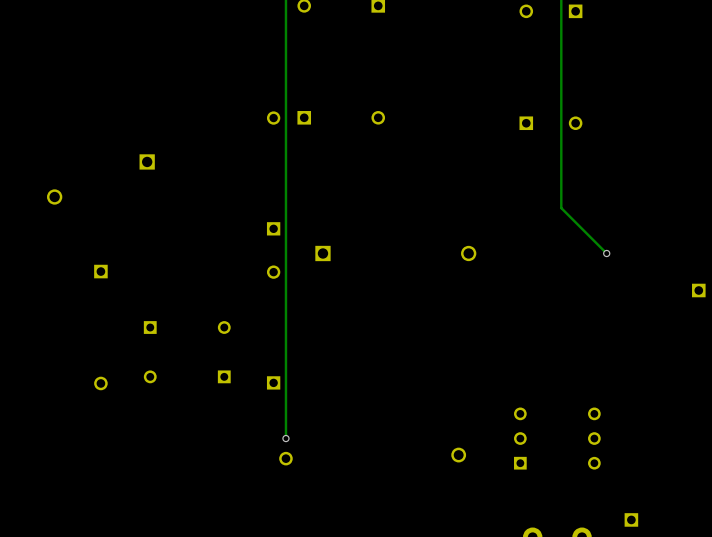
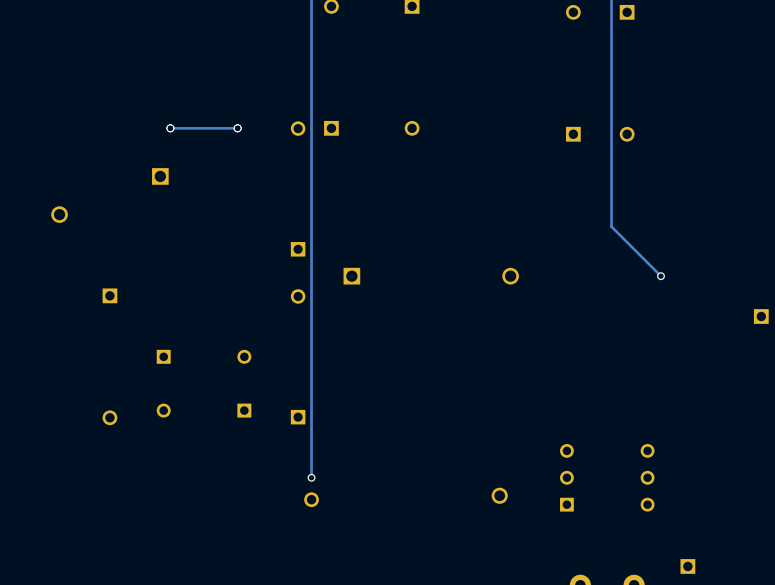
via: none -> (170, 128)
track: none -> (237, 128) (170, 128)
via: none -> (237, 128)

